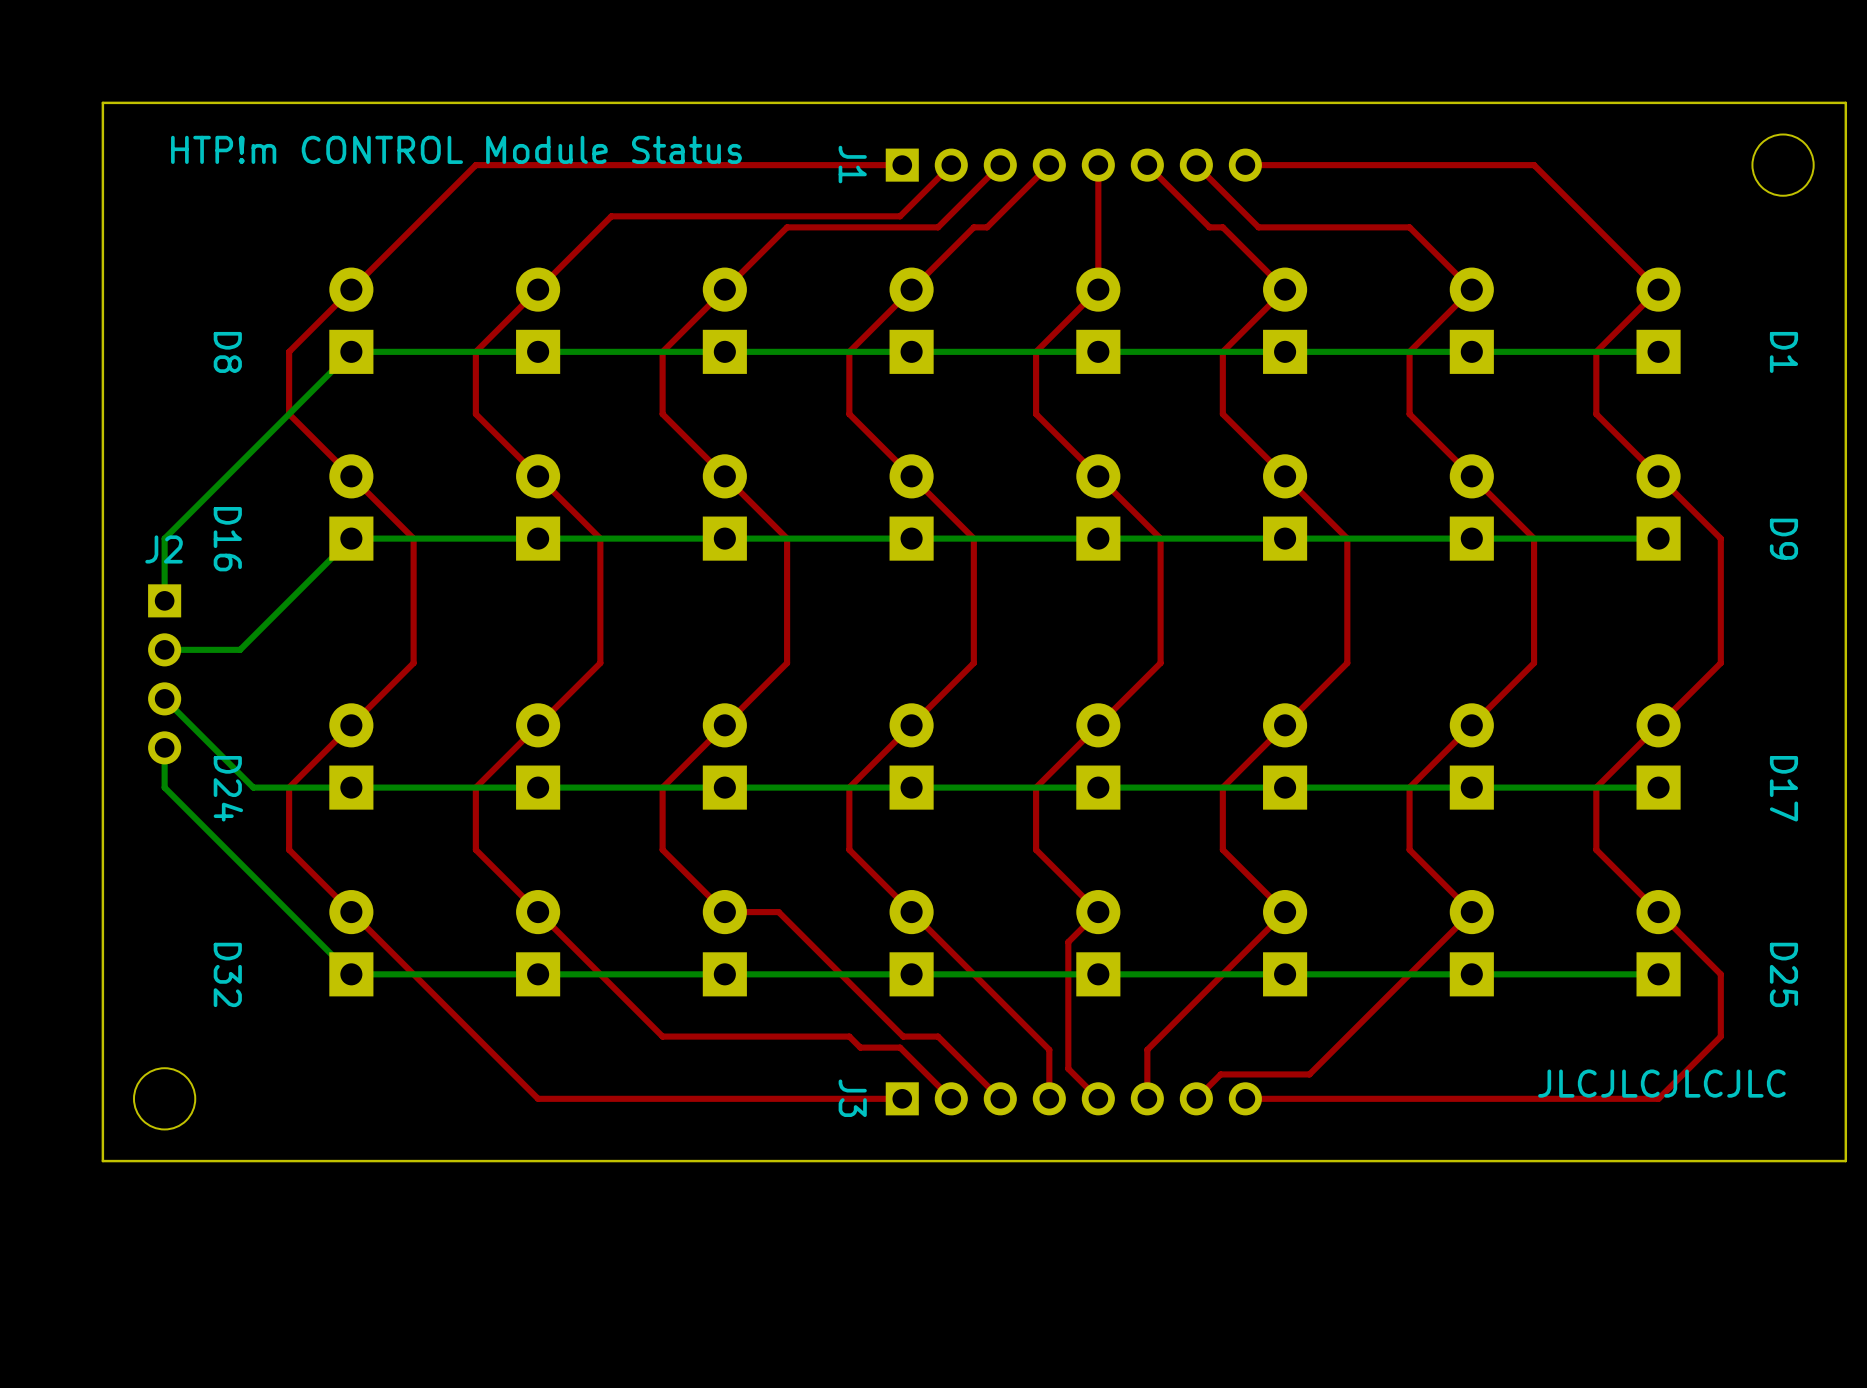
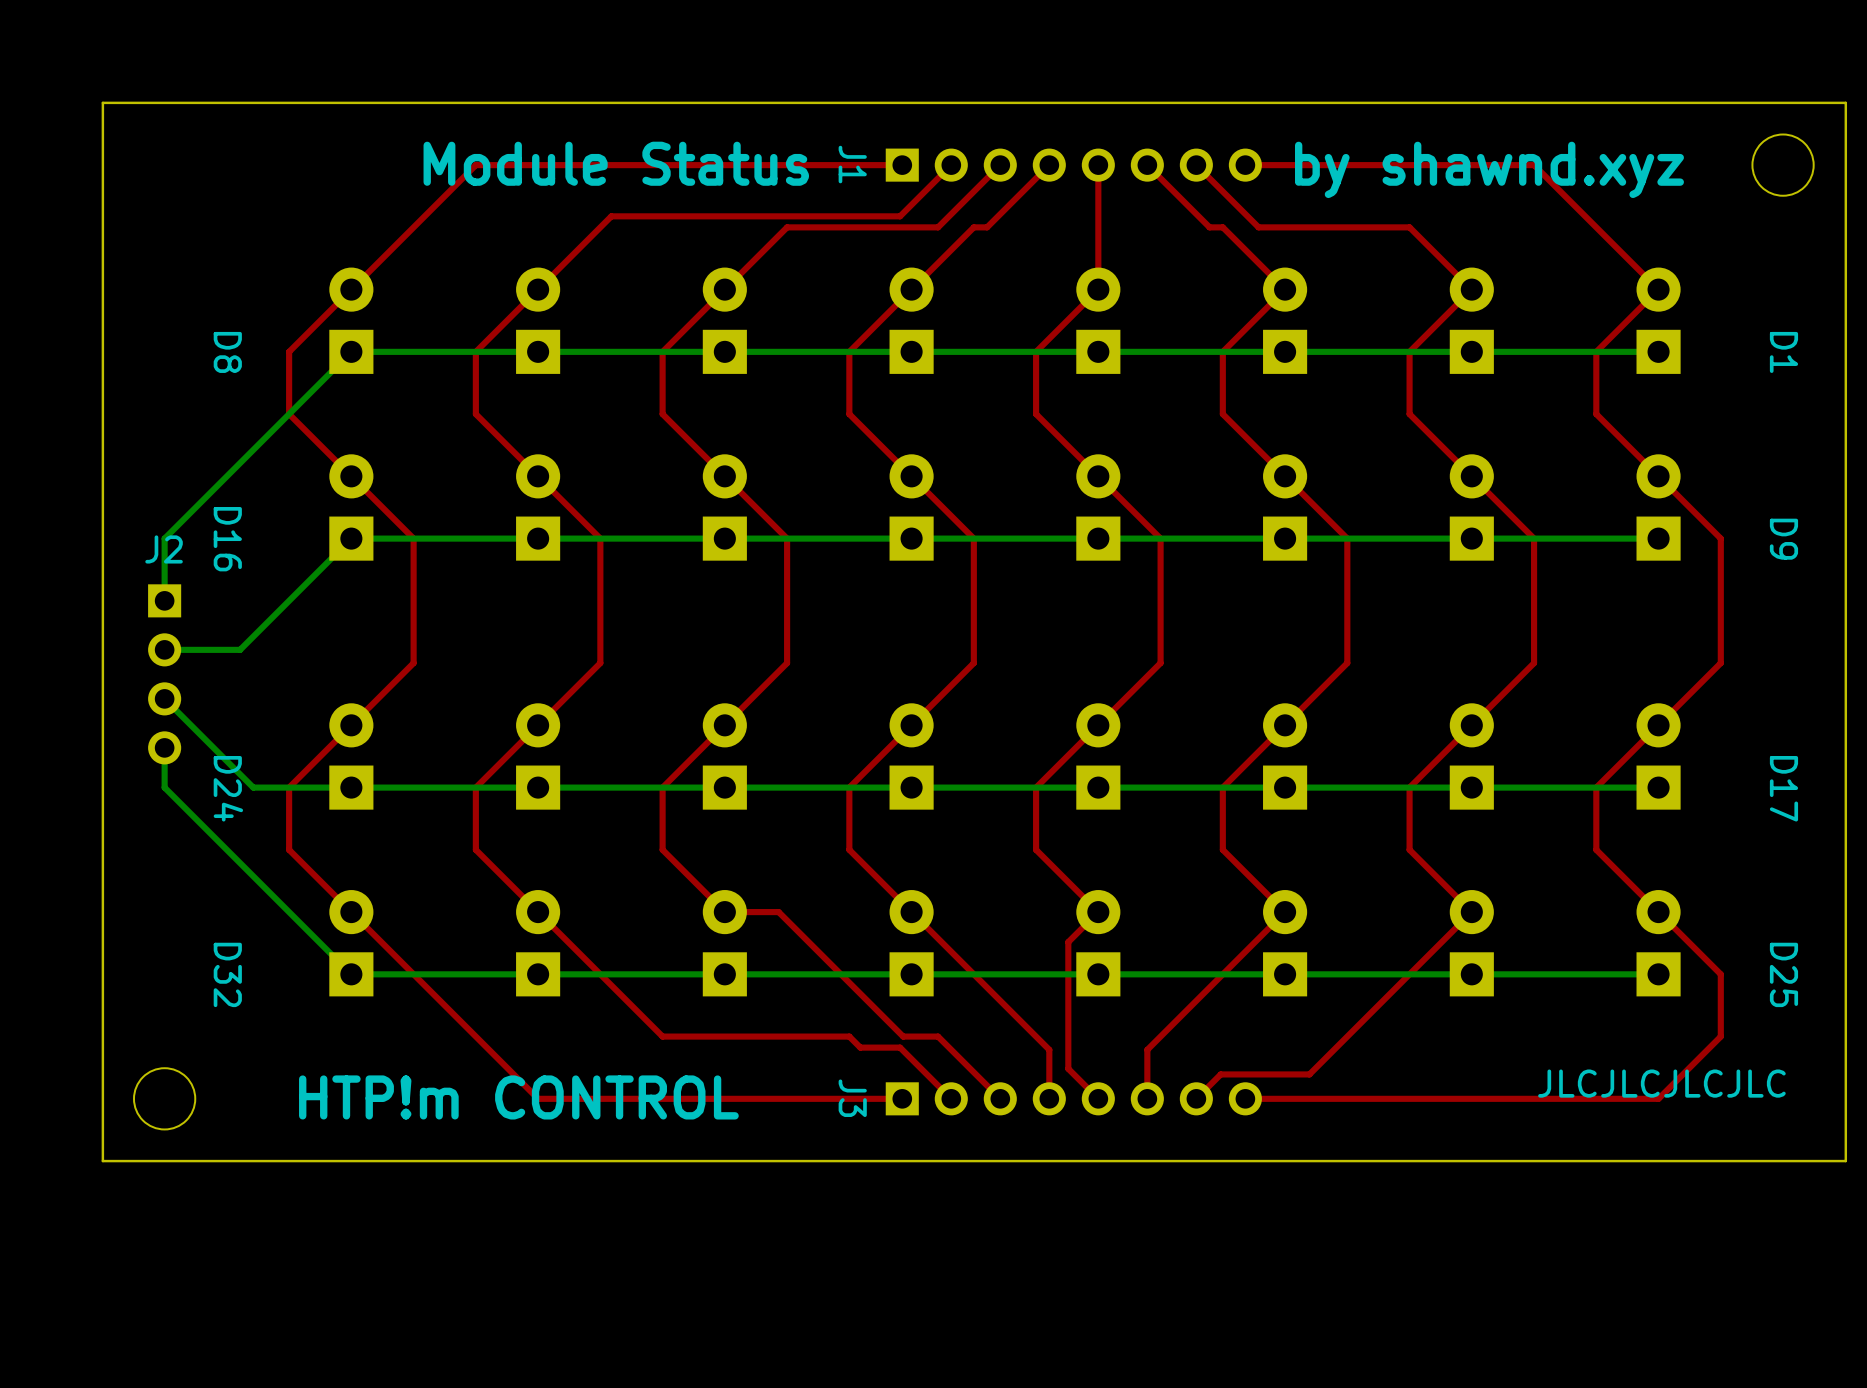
text: HTP!m CONTROL Module Status (456, 149) -> Module Status (616, 163)
text: none -> by shawnd.xyz (1489, 169)
text: none -> HTP!m CONTROL (518, 1097)

